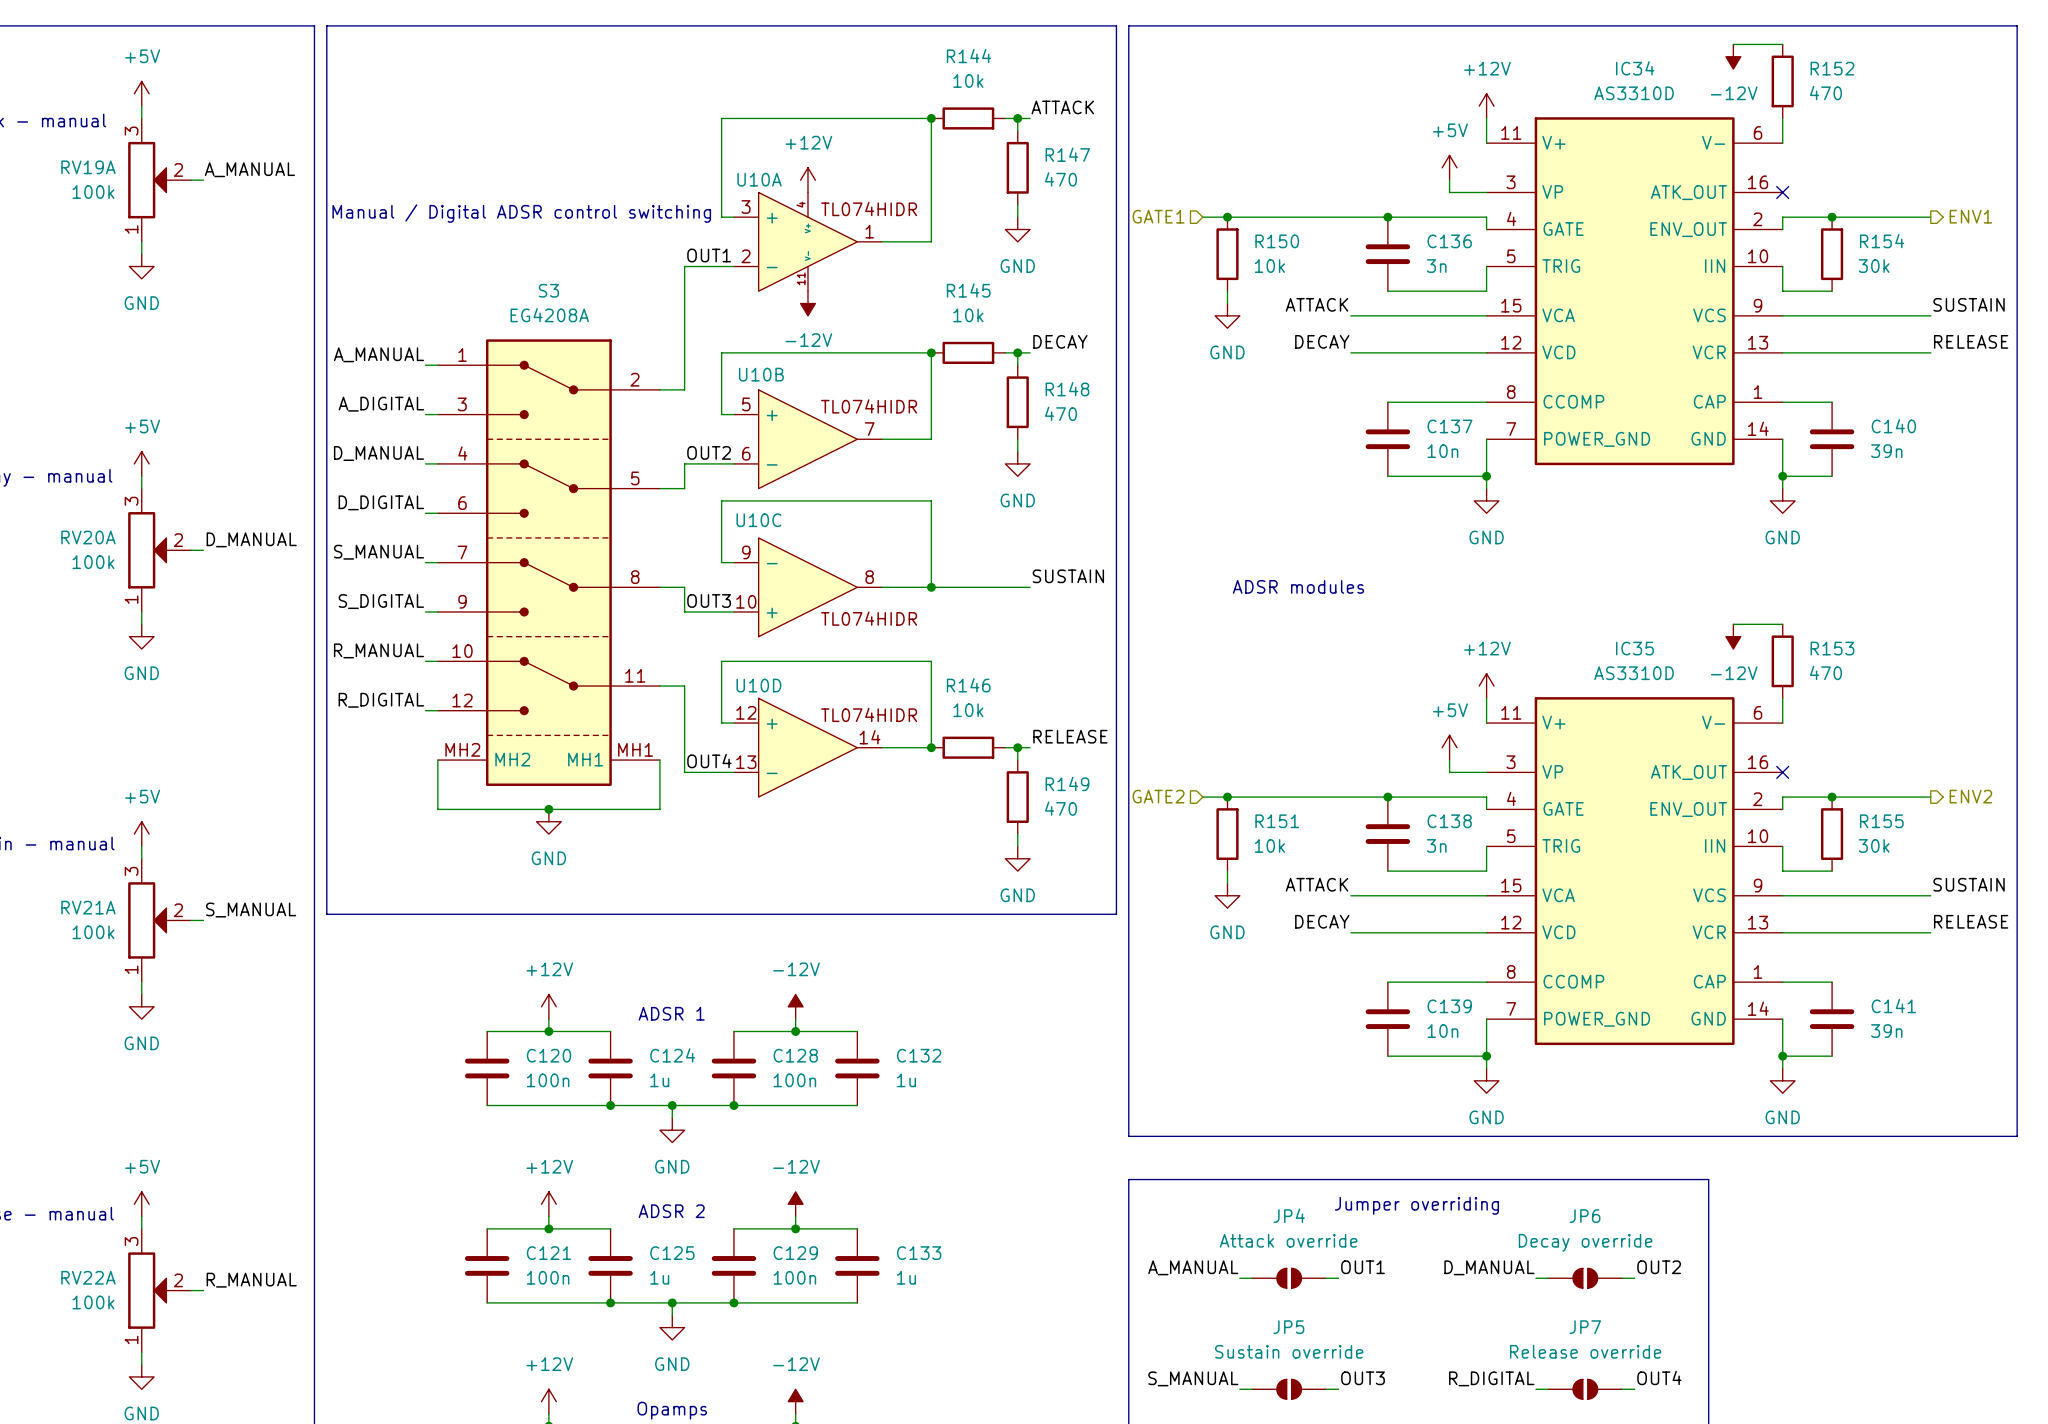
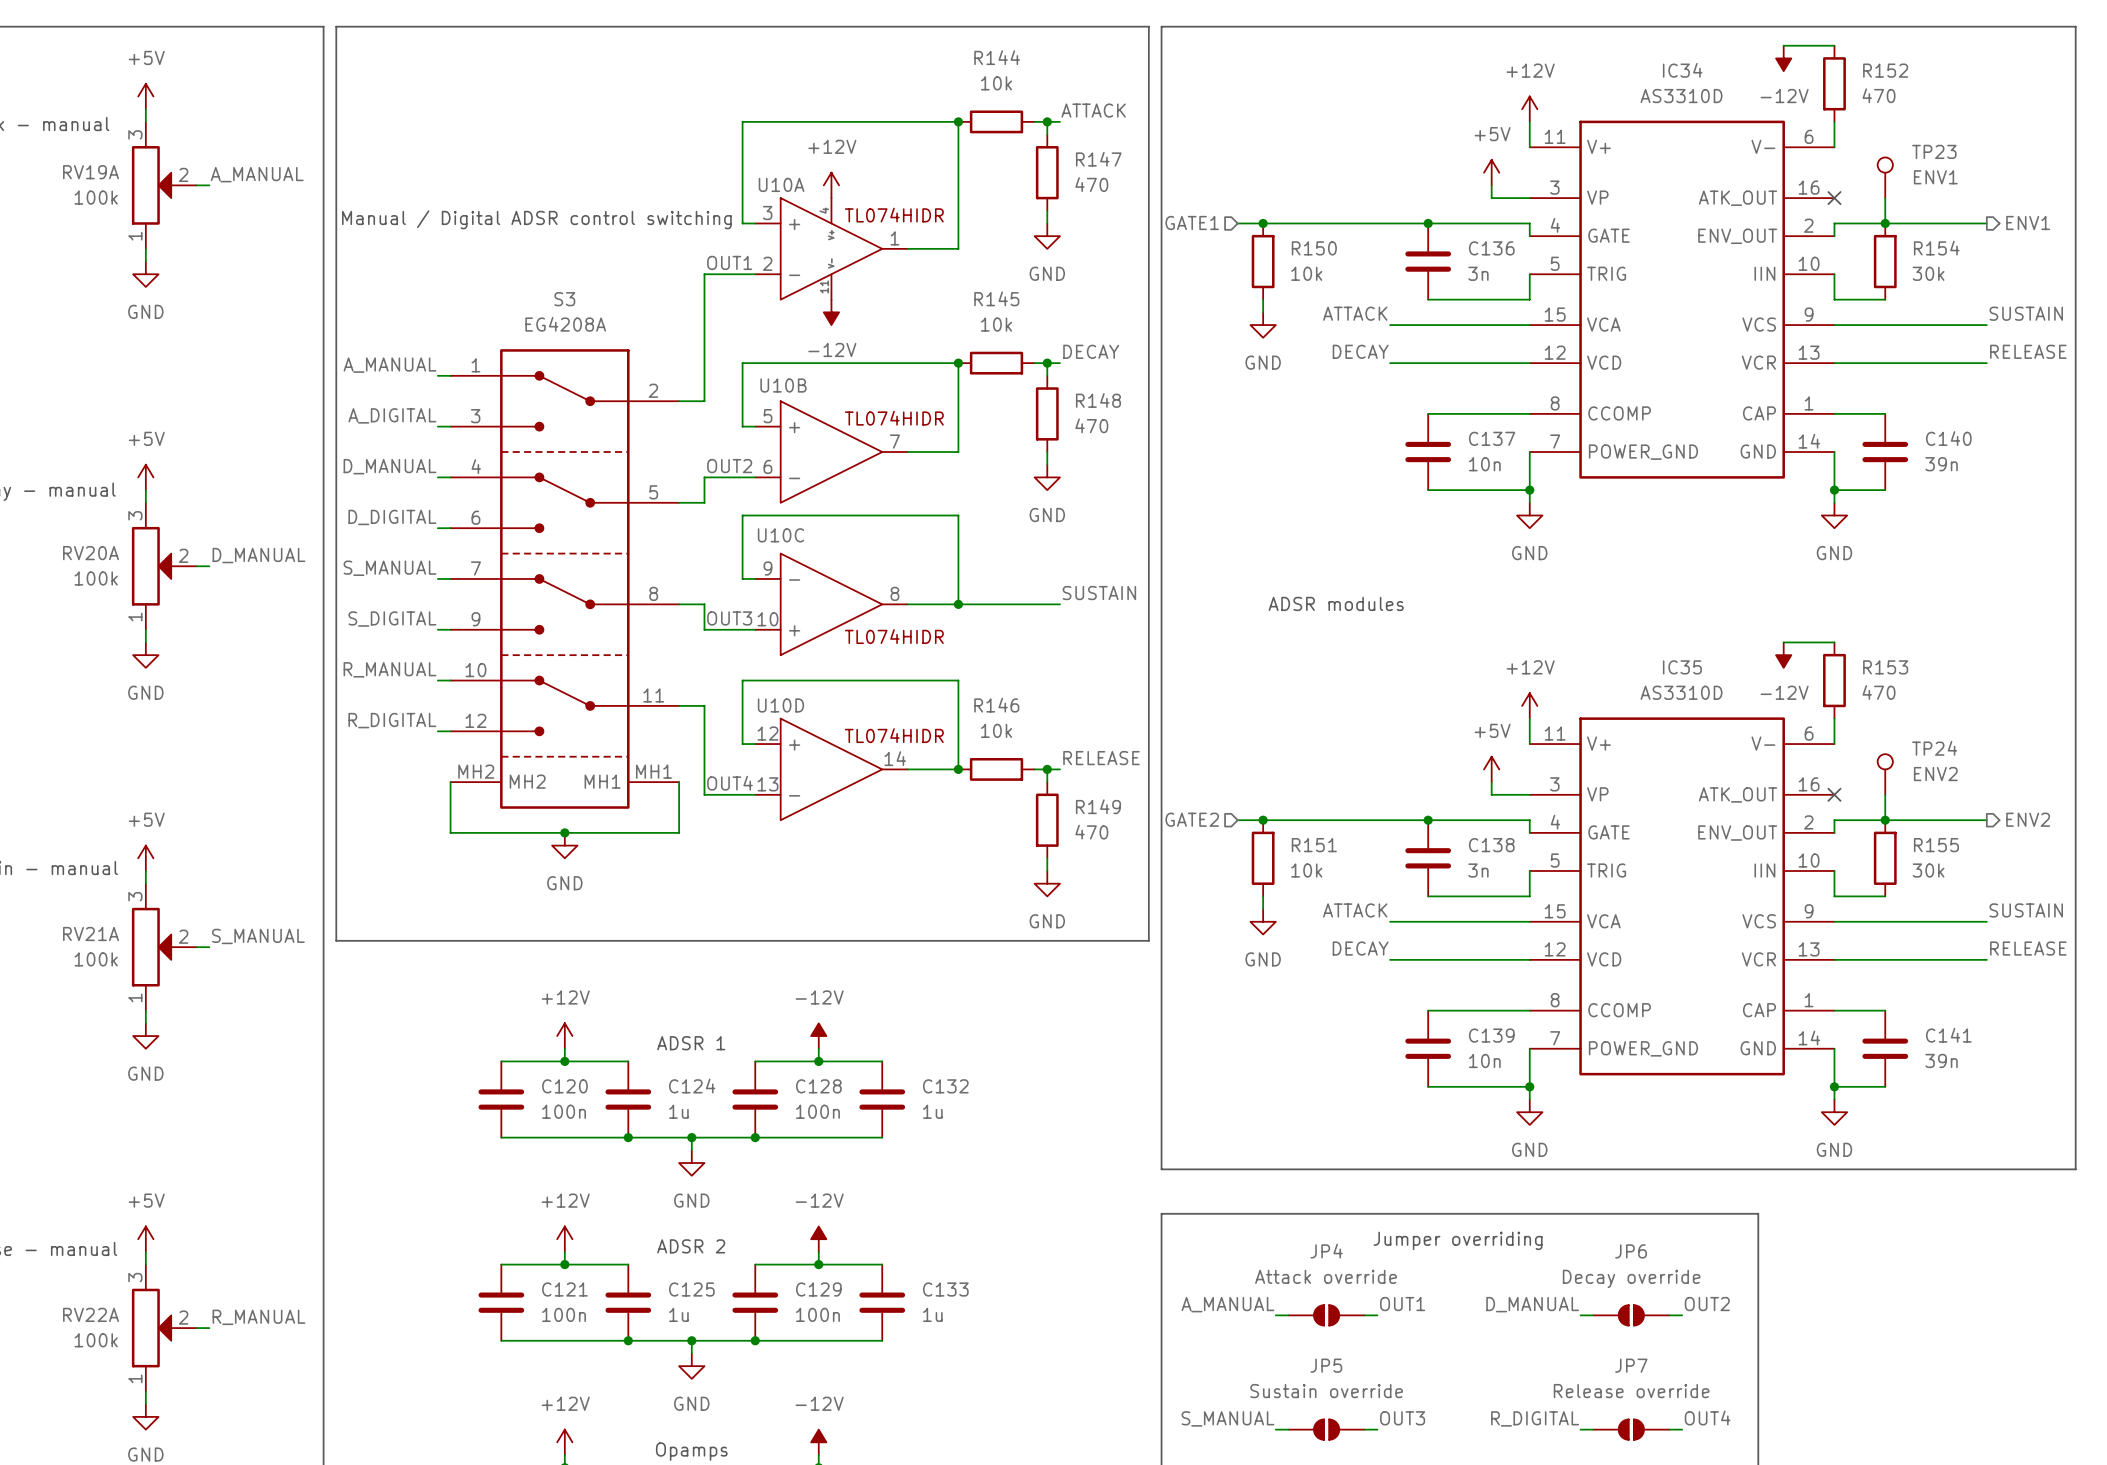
TP23: none -> ENV1 (1885, 177)
wire: none -> (1885, 198) (1885, 223)
TP24: none -> ENV2 (1885, 774)
wire: none -> (1885, 794) (1885, 820)

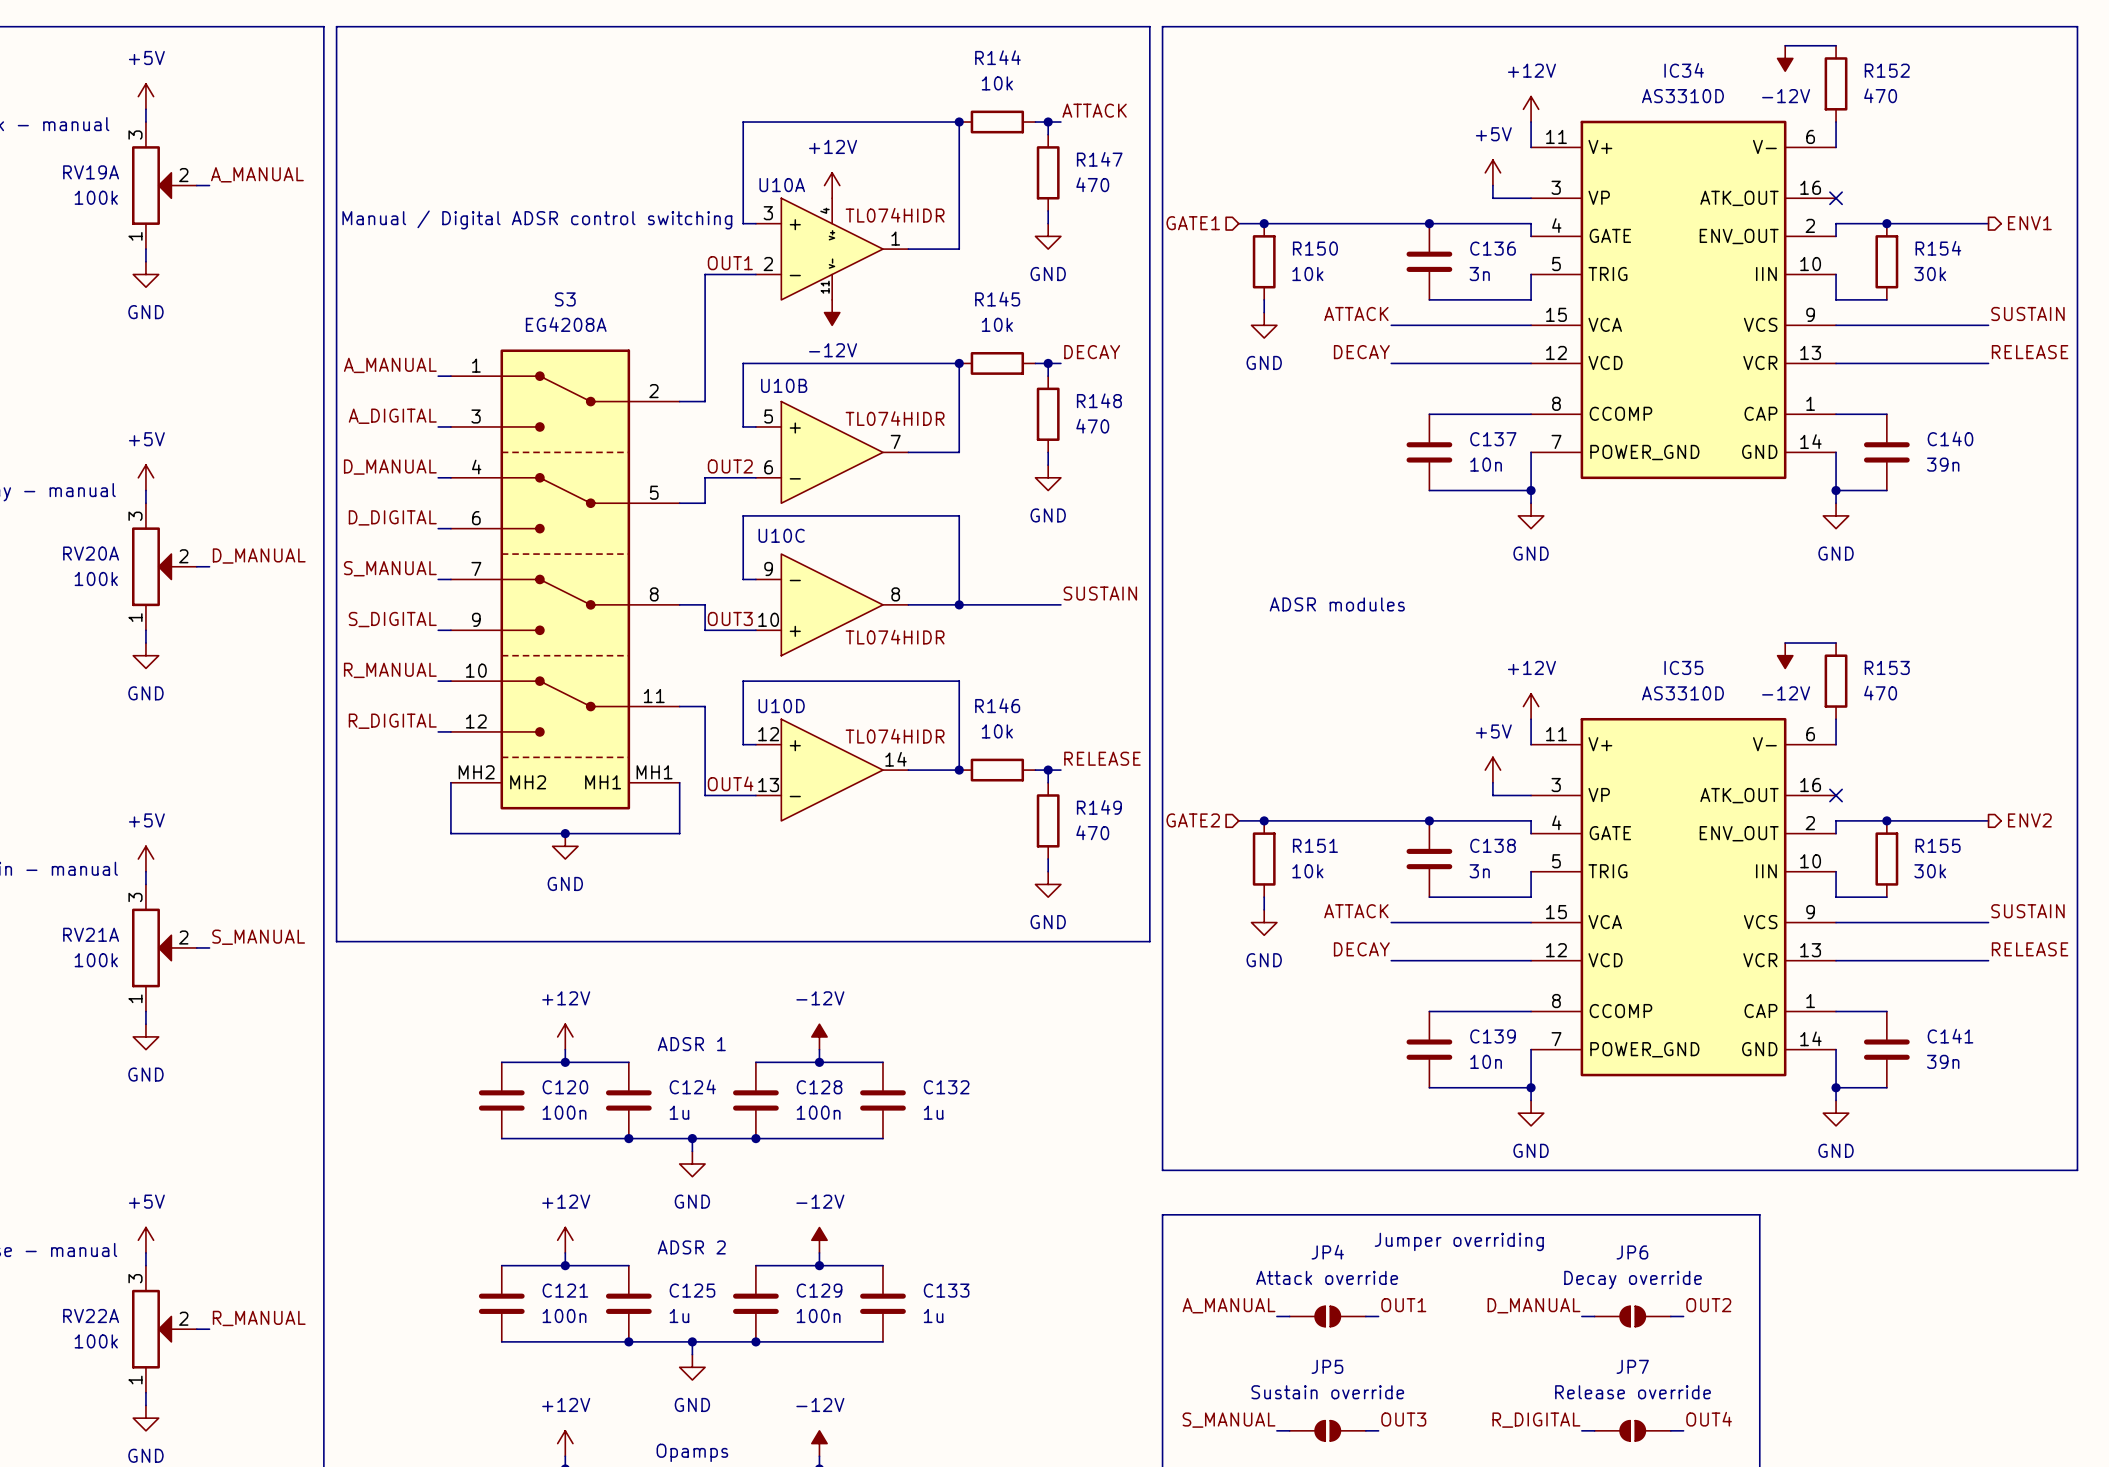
TP23: ENV1 (1885, 177) -> none
wire: (1885, 198) (1885, 223) -> none
TP24: ENV2 (1885, 774) -> none
wire: (1885, 794) (1885, 820) -> none

